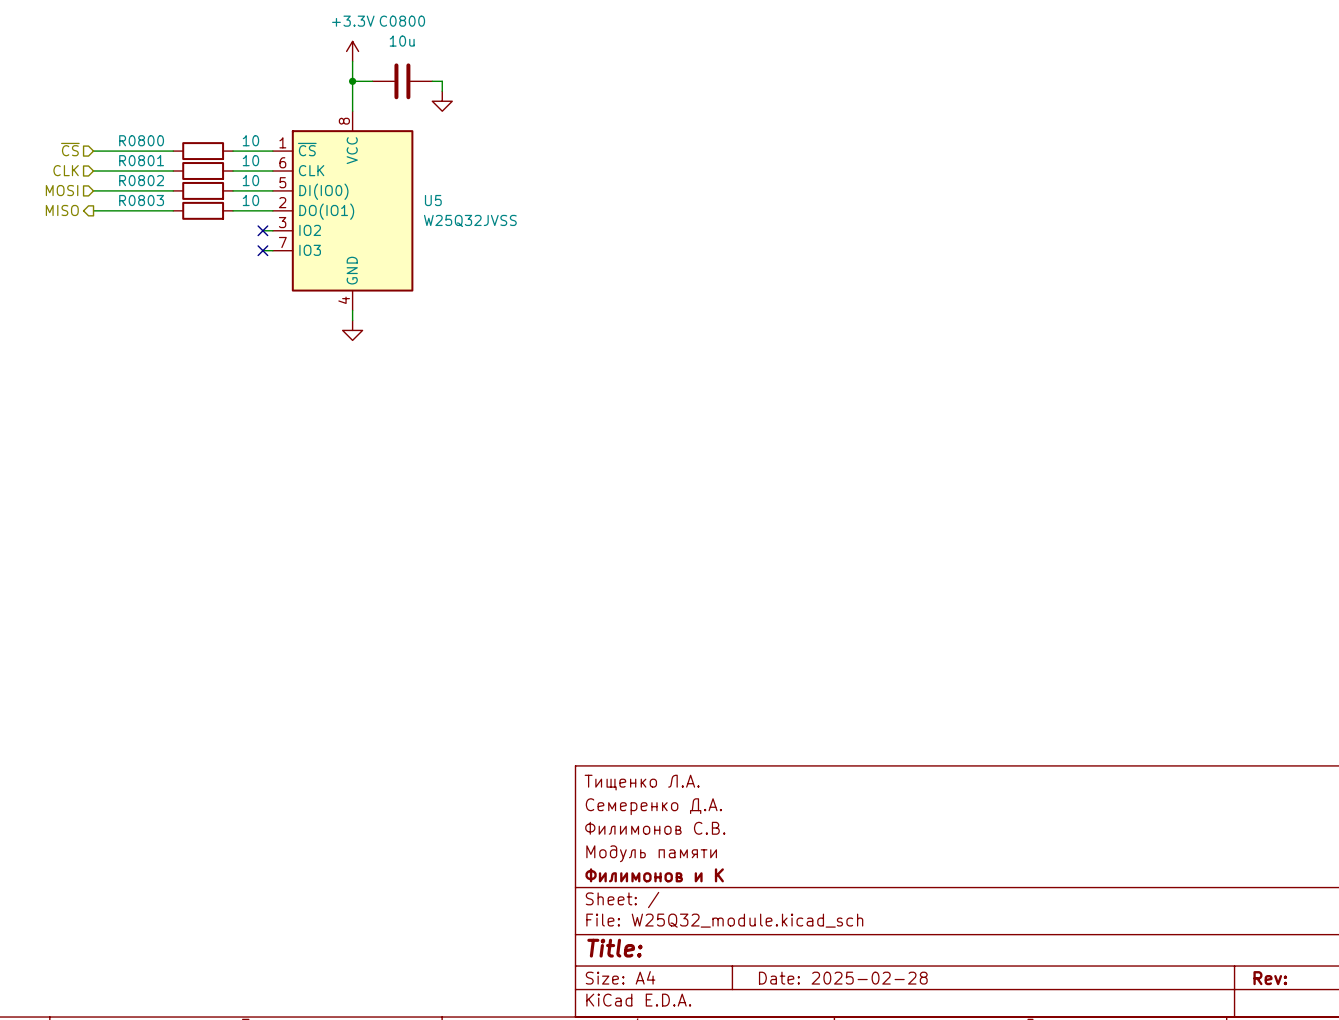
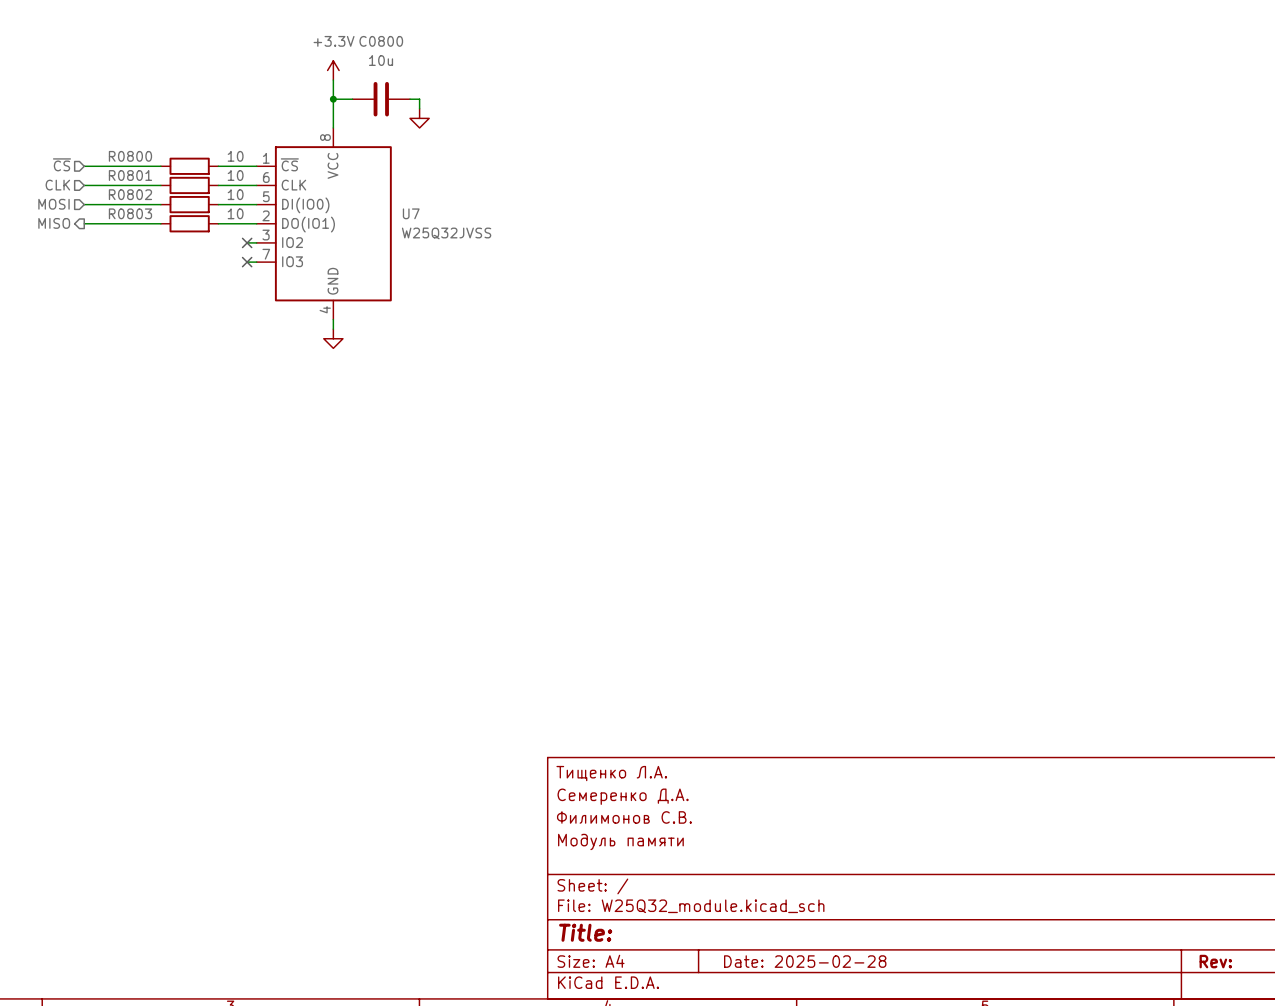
U5 name: U5 (433, 200) -> U7 (411, 213)
title block: Филимонов и К (654, 875) -> none

